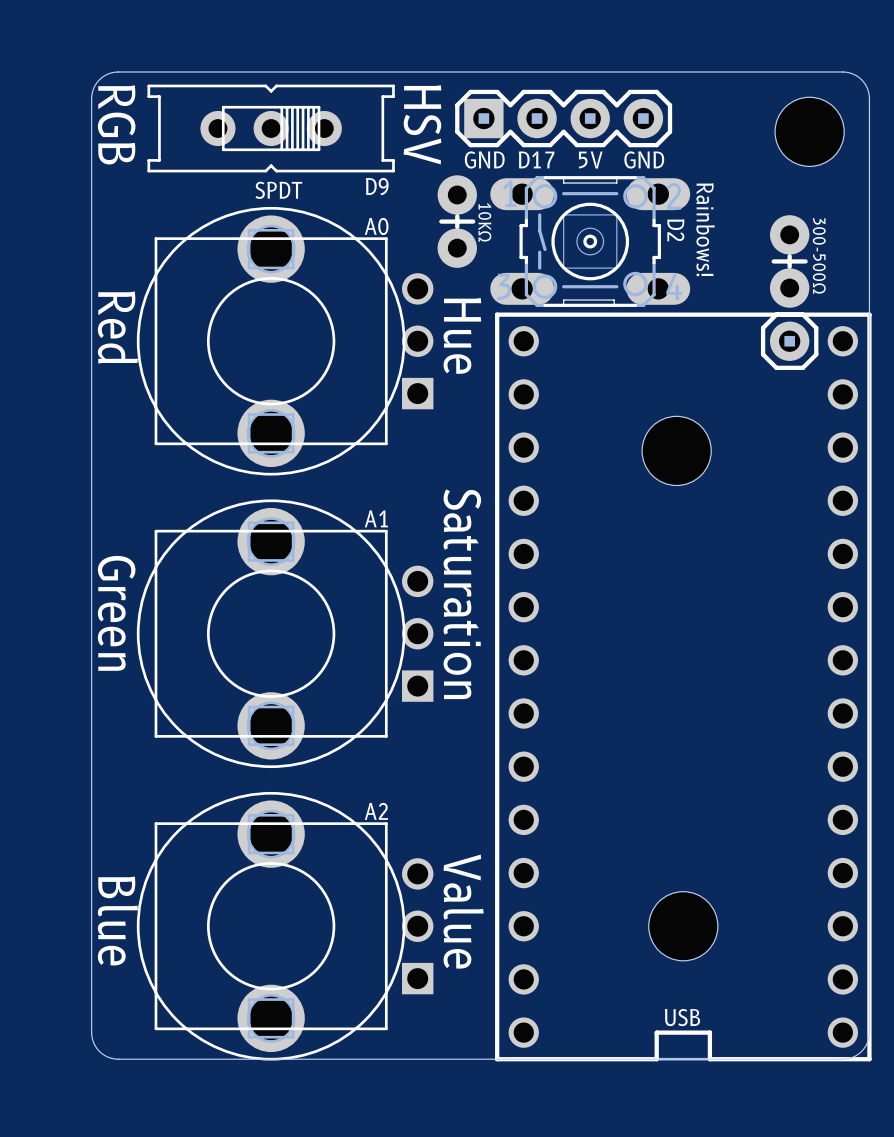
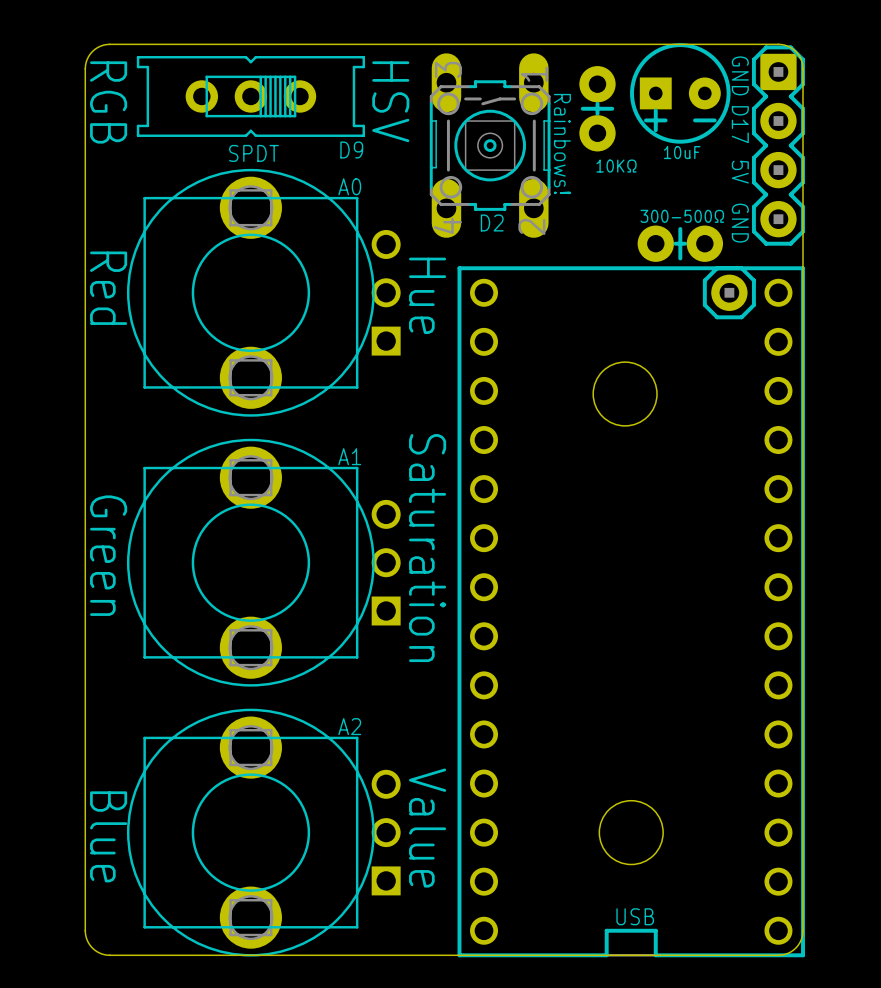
text: none -> GND (740, 75)
part rotation: 0° (563, 118) -> 90° clockwise (778, 145)
part position: (563, 118) -> (778, 145)
part: none -> 10uF (680, 93)
part: (809, 131) -> none
text: GND (484, 159) -> none
text rotation: 0° (536, 159) -> 90° clockwise (740, 124)
text position: D17 (536, 159) -> D17 (740, 124)
text rotation: 0° (590, 159) -> 90° clockwise (740, 172)
text position: 5V (590, 159) -> 5V (740, 172)
text: GND (644, 159) -> none
D2 footprint: [490, 176, 691, 307] -> [429, 53, 551, 238]
part position: (457, 221) -> (597, 108)
part value rotation: 0° (484, 222) -> 90° counterclockwise (616, 166)
text position: Rainbows! (705, 229) -> Rainbows! (562, 144)
D2 name position: D2 (675, 230) -> D2 (492, 222)
part value position: 300-500Ω (819, 255) -> 300-500Ω (682, 216)
part rotation: 0° (789, 261) -> 90° clockwise (680, 243)
part position: (789, 261) -> (680, 243)
text: none -> GND (740, 223)

